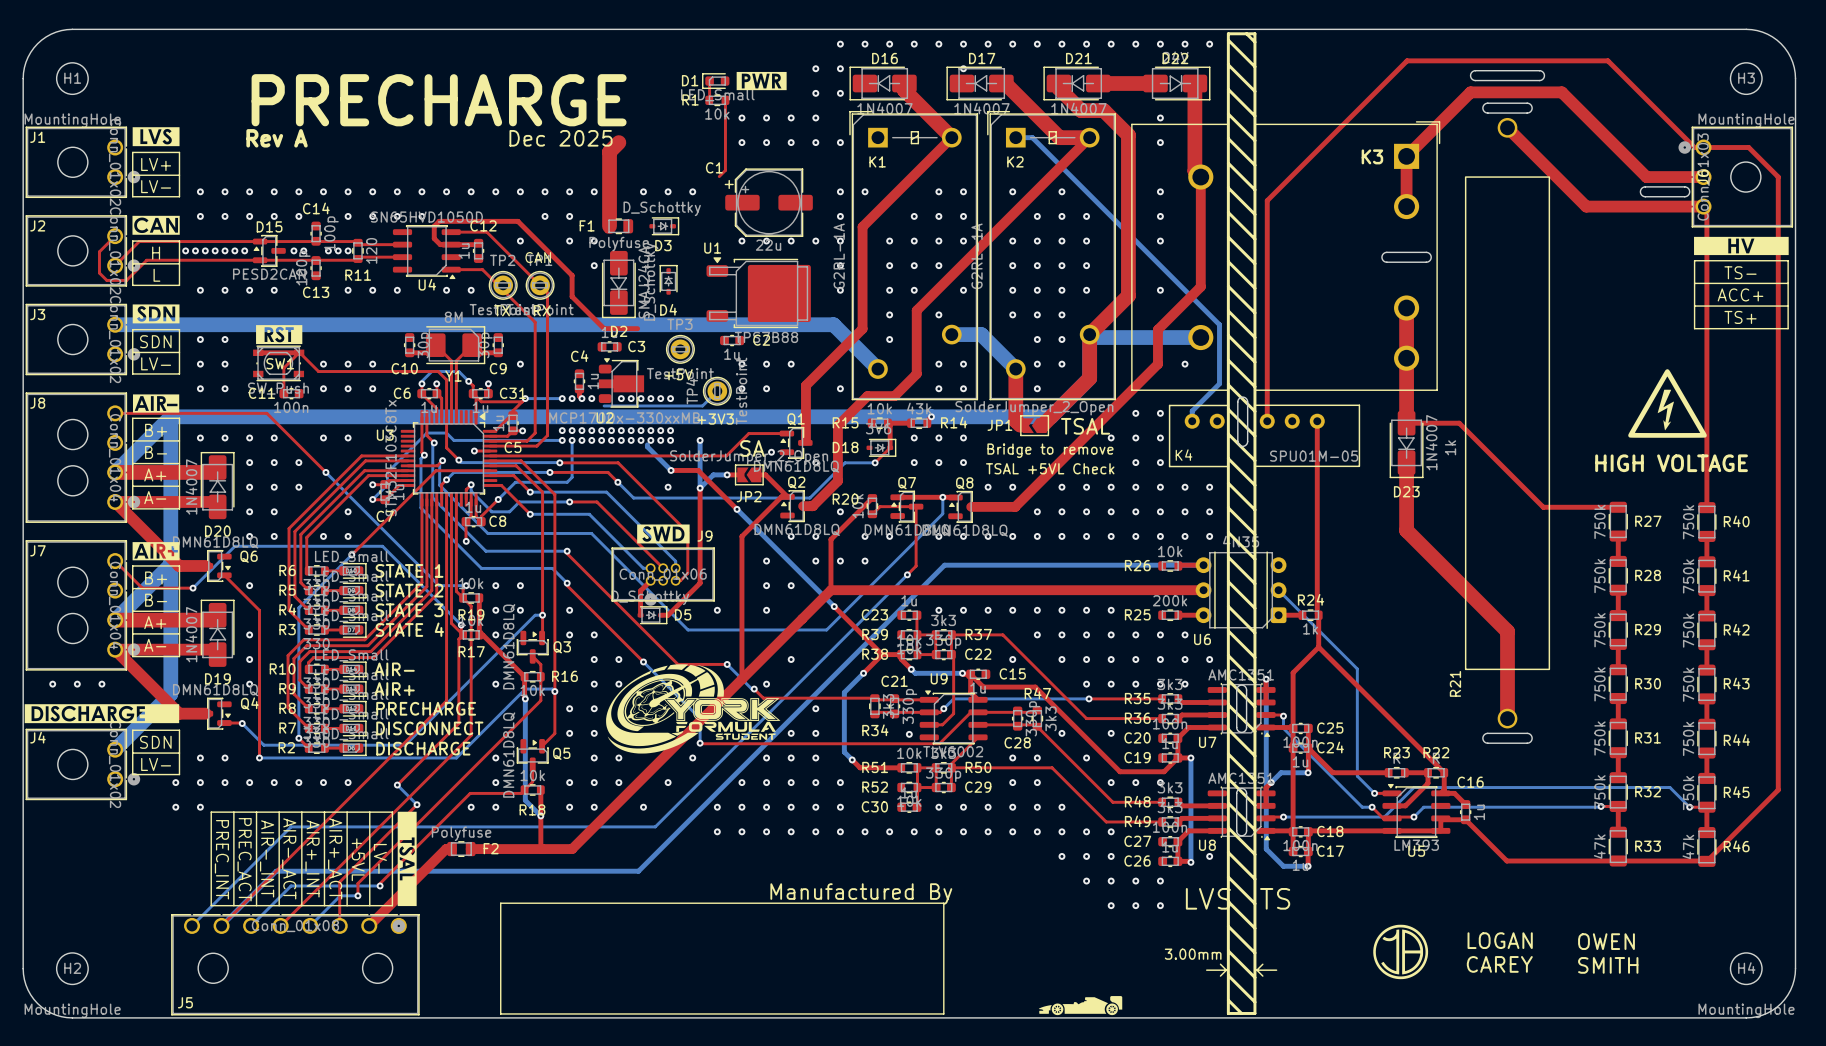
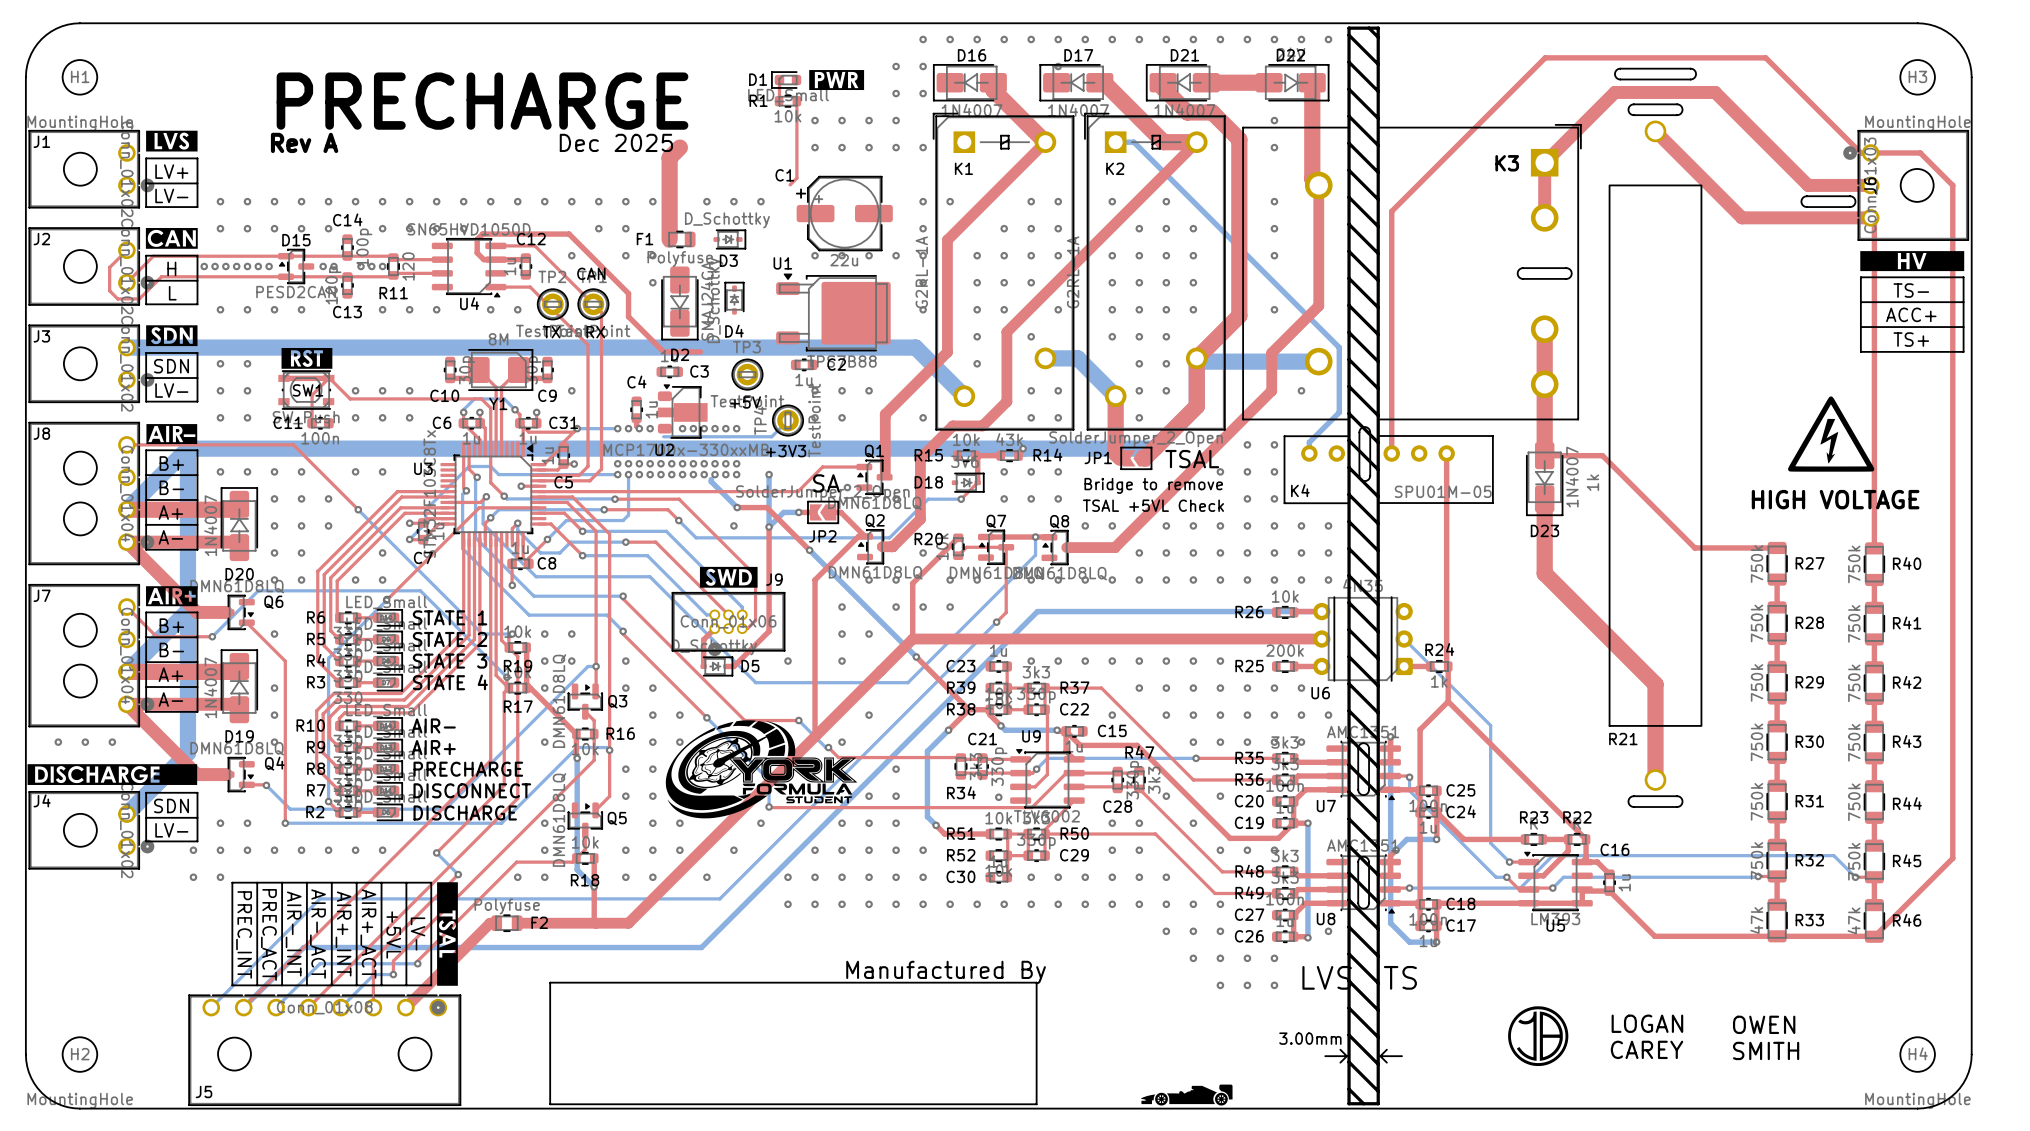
R21 name rotation: 0° (1455, 683) -> 90° clockwise (1623, 739)

